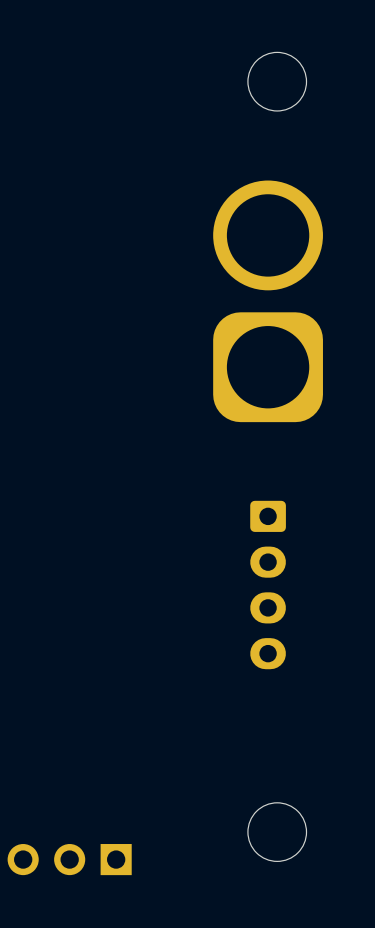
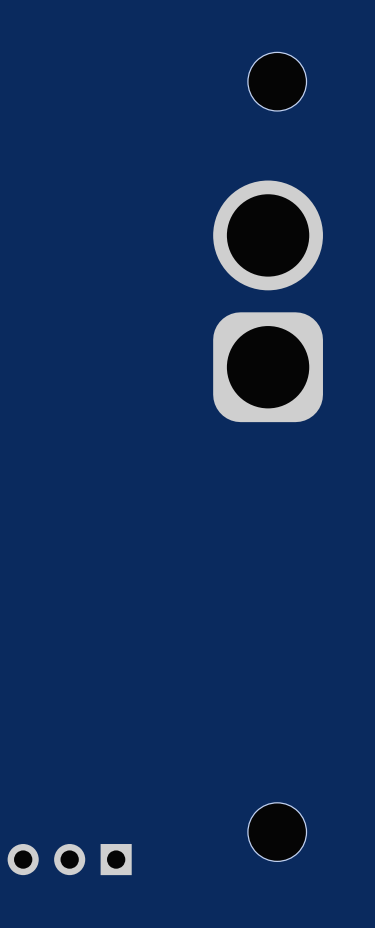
part: (268, 585) -> none

